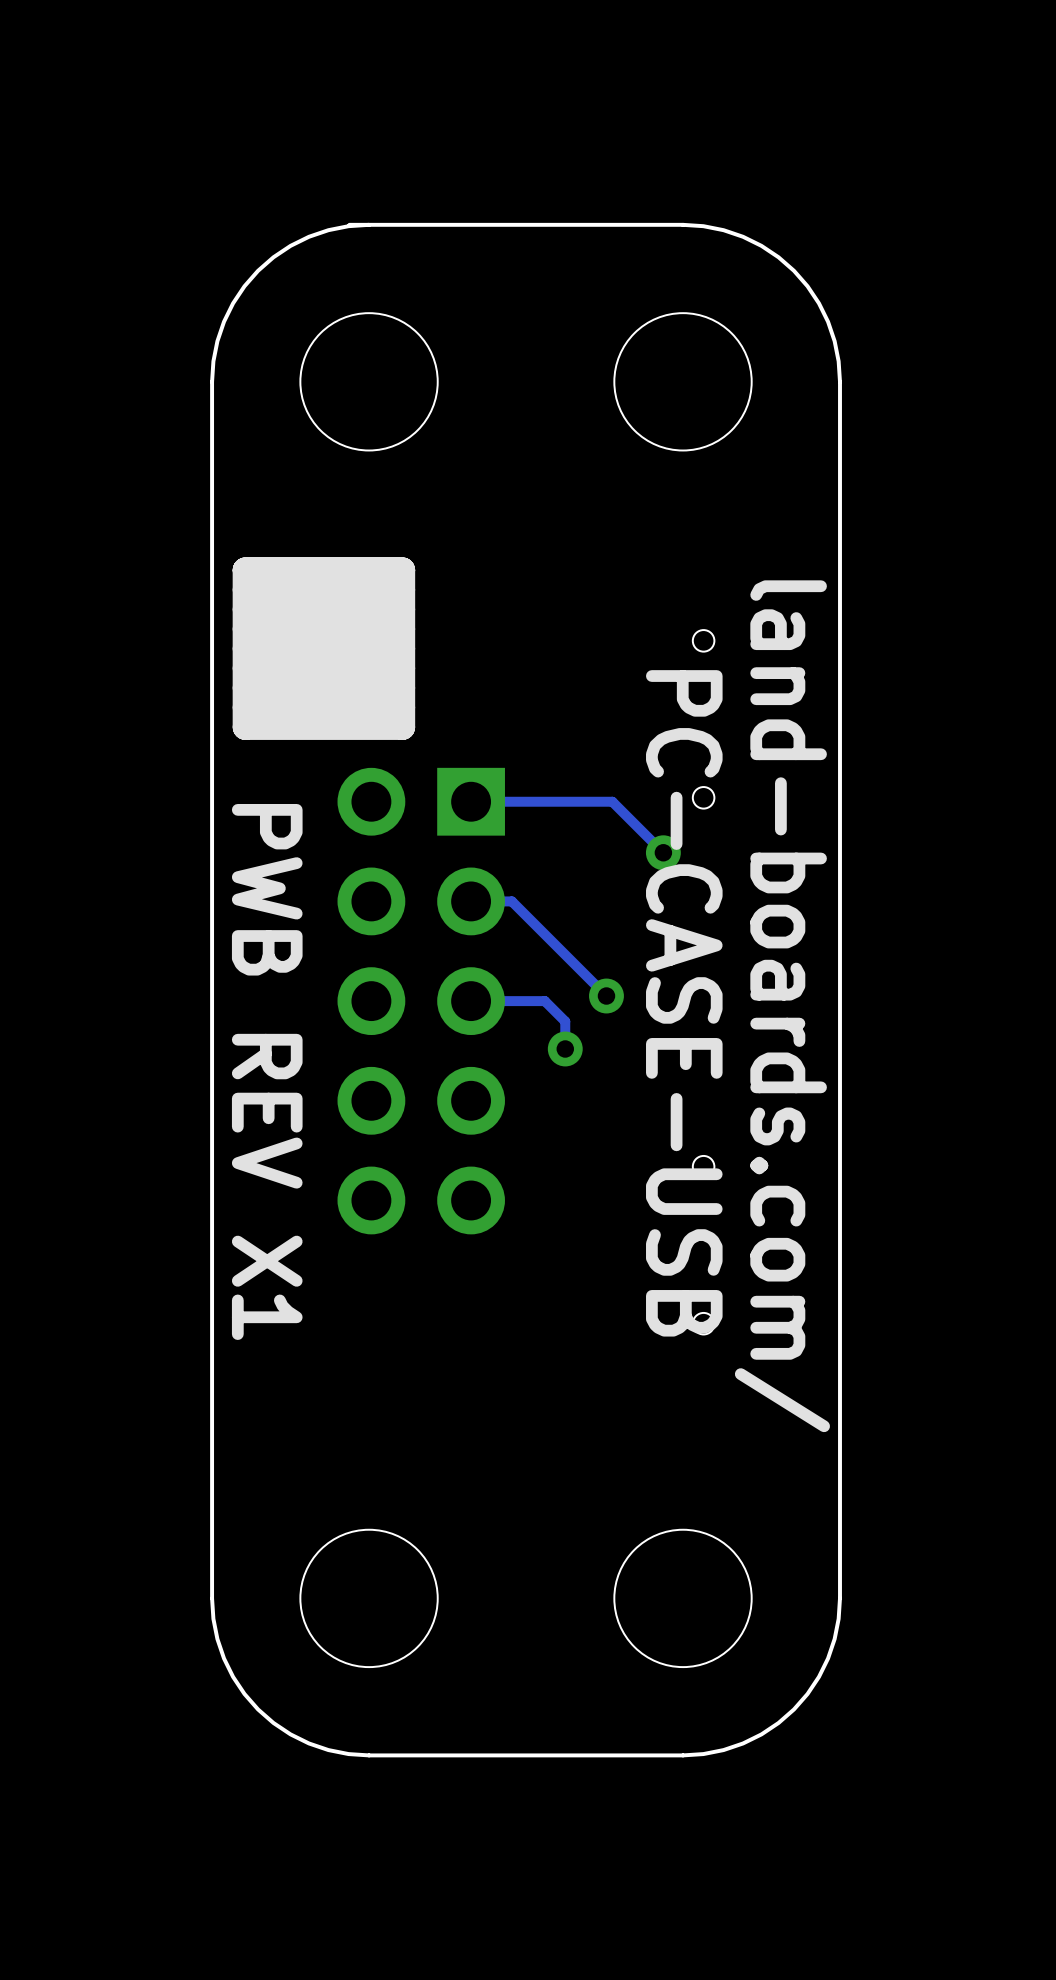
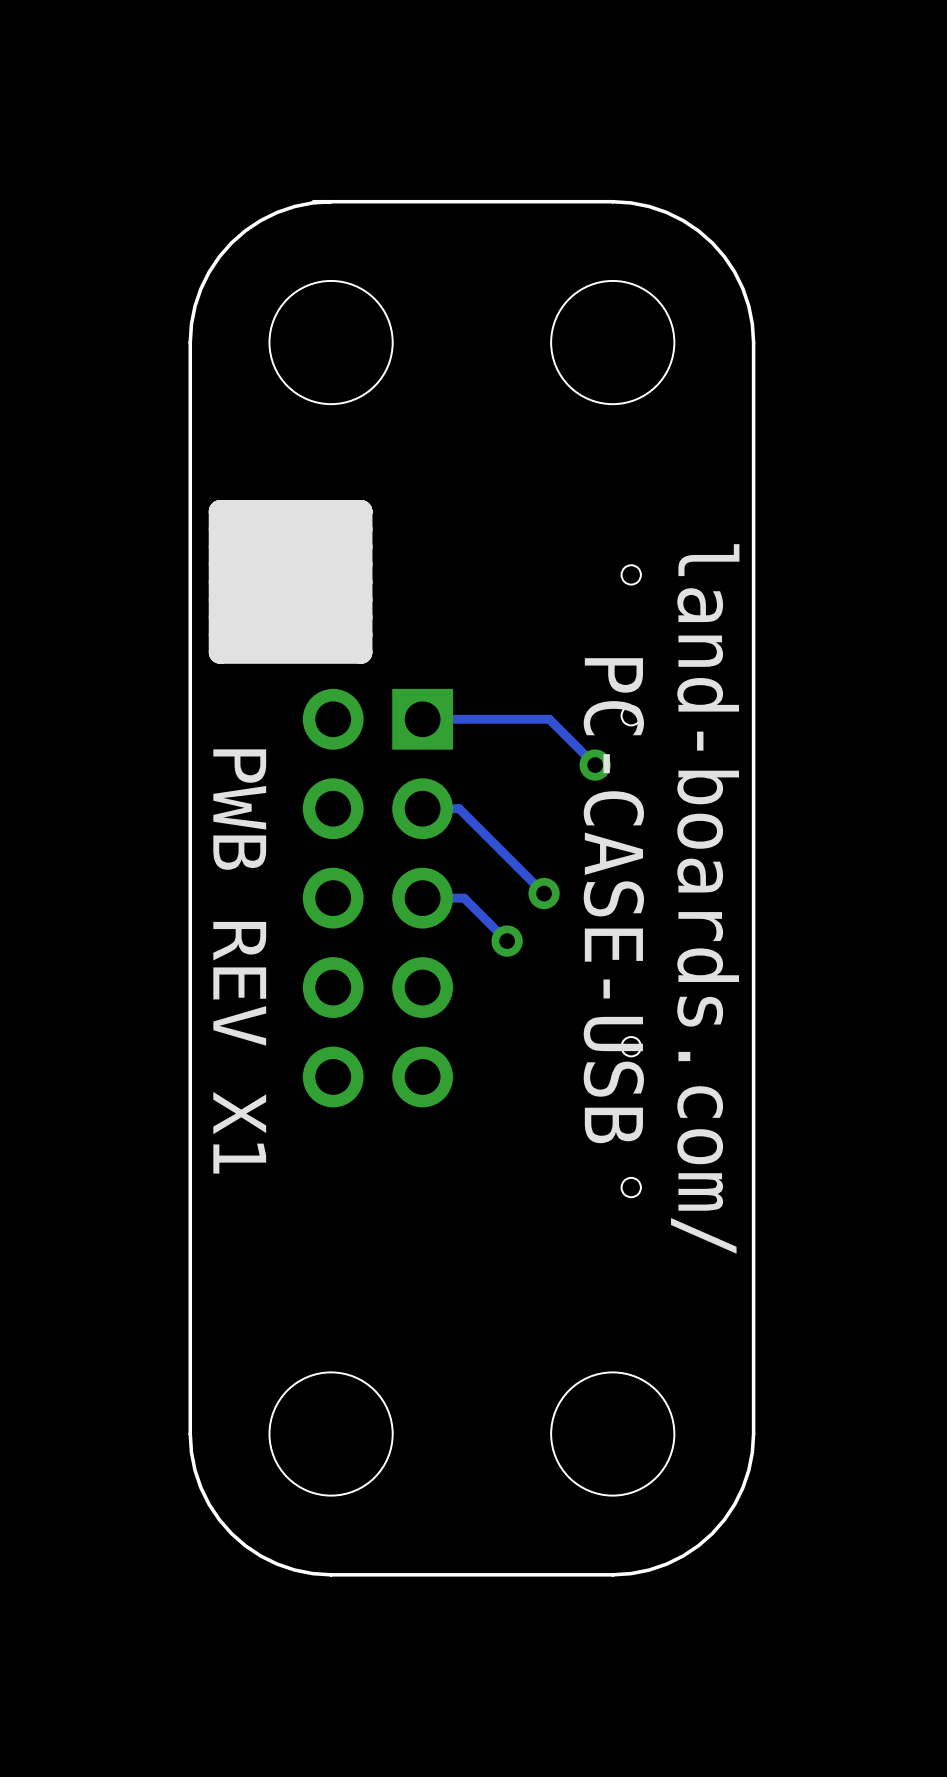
track: (517, 1001) (544, 1001) (565, 1021) (565, 1048) -> (464, 898) (507, 941)

